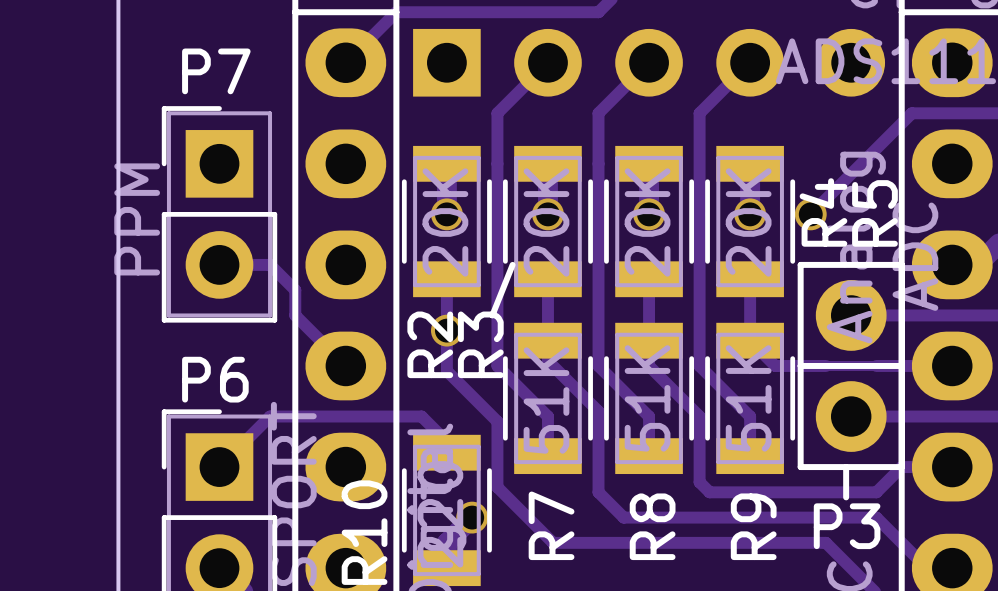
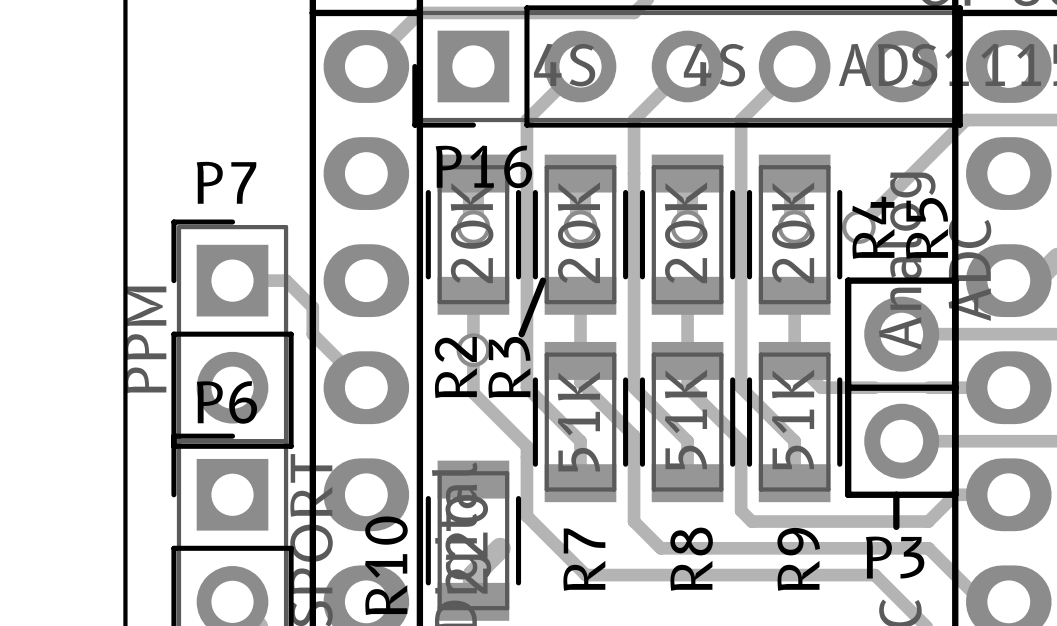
P16 side: bottom (649, 62) -> top (687, 66)
P7 position: (219, 214) -> (232, 334)
track: (446, 452) (446, 441) (421, 416) (270, 416) (219, 467) -> none
via: (472, 517) -> none

